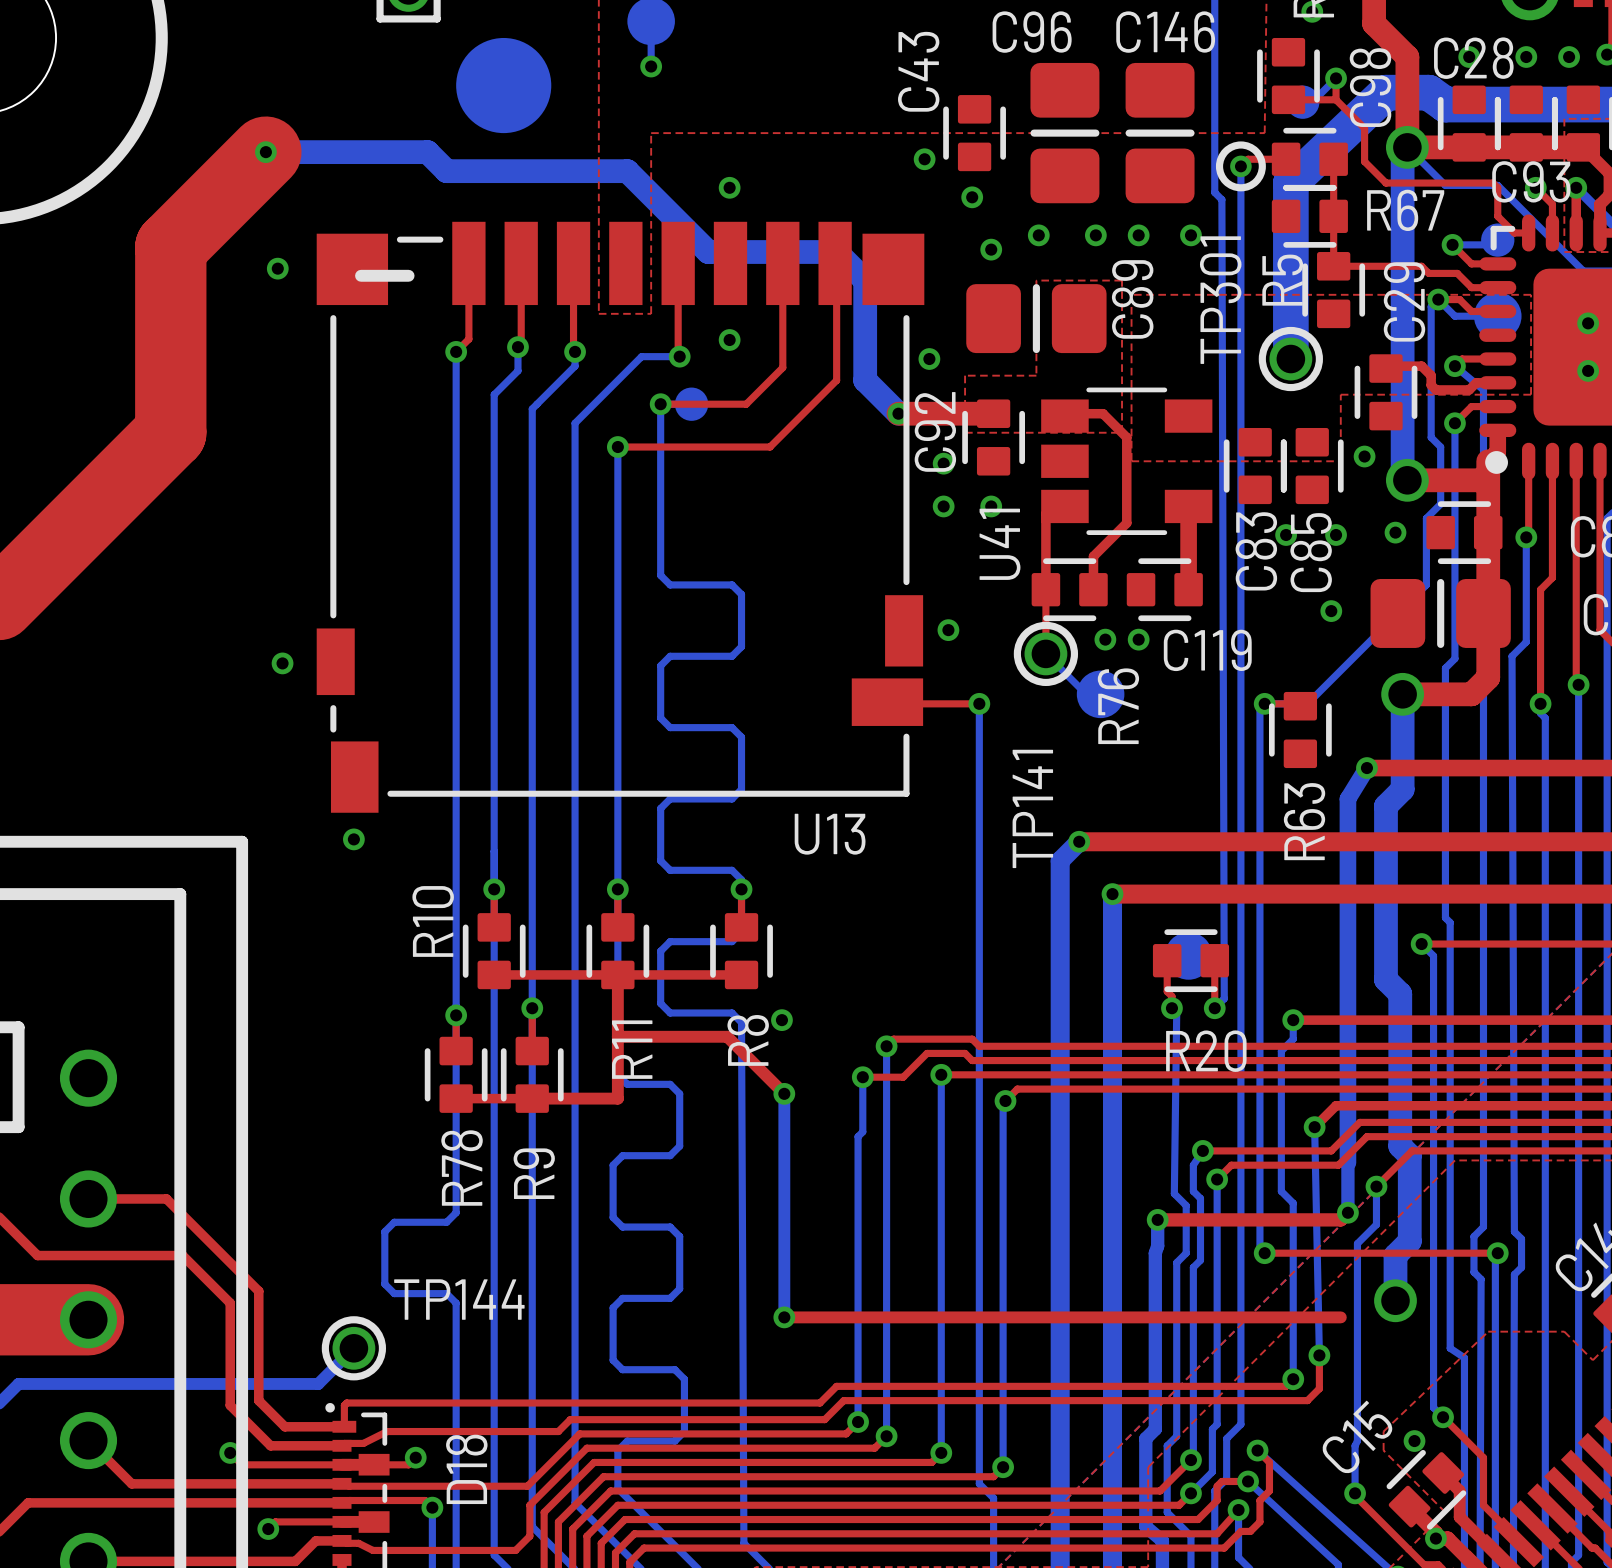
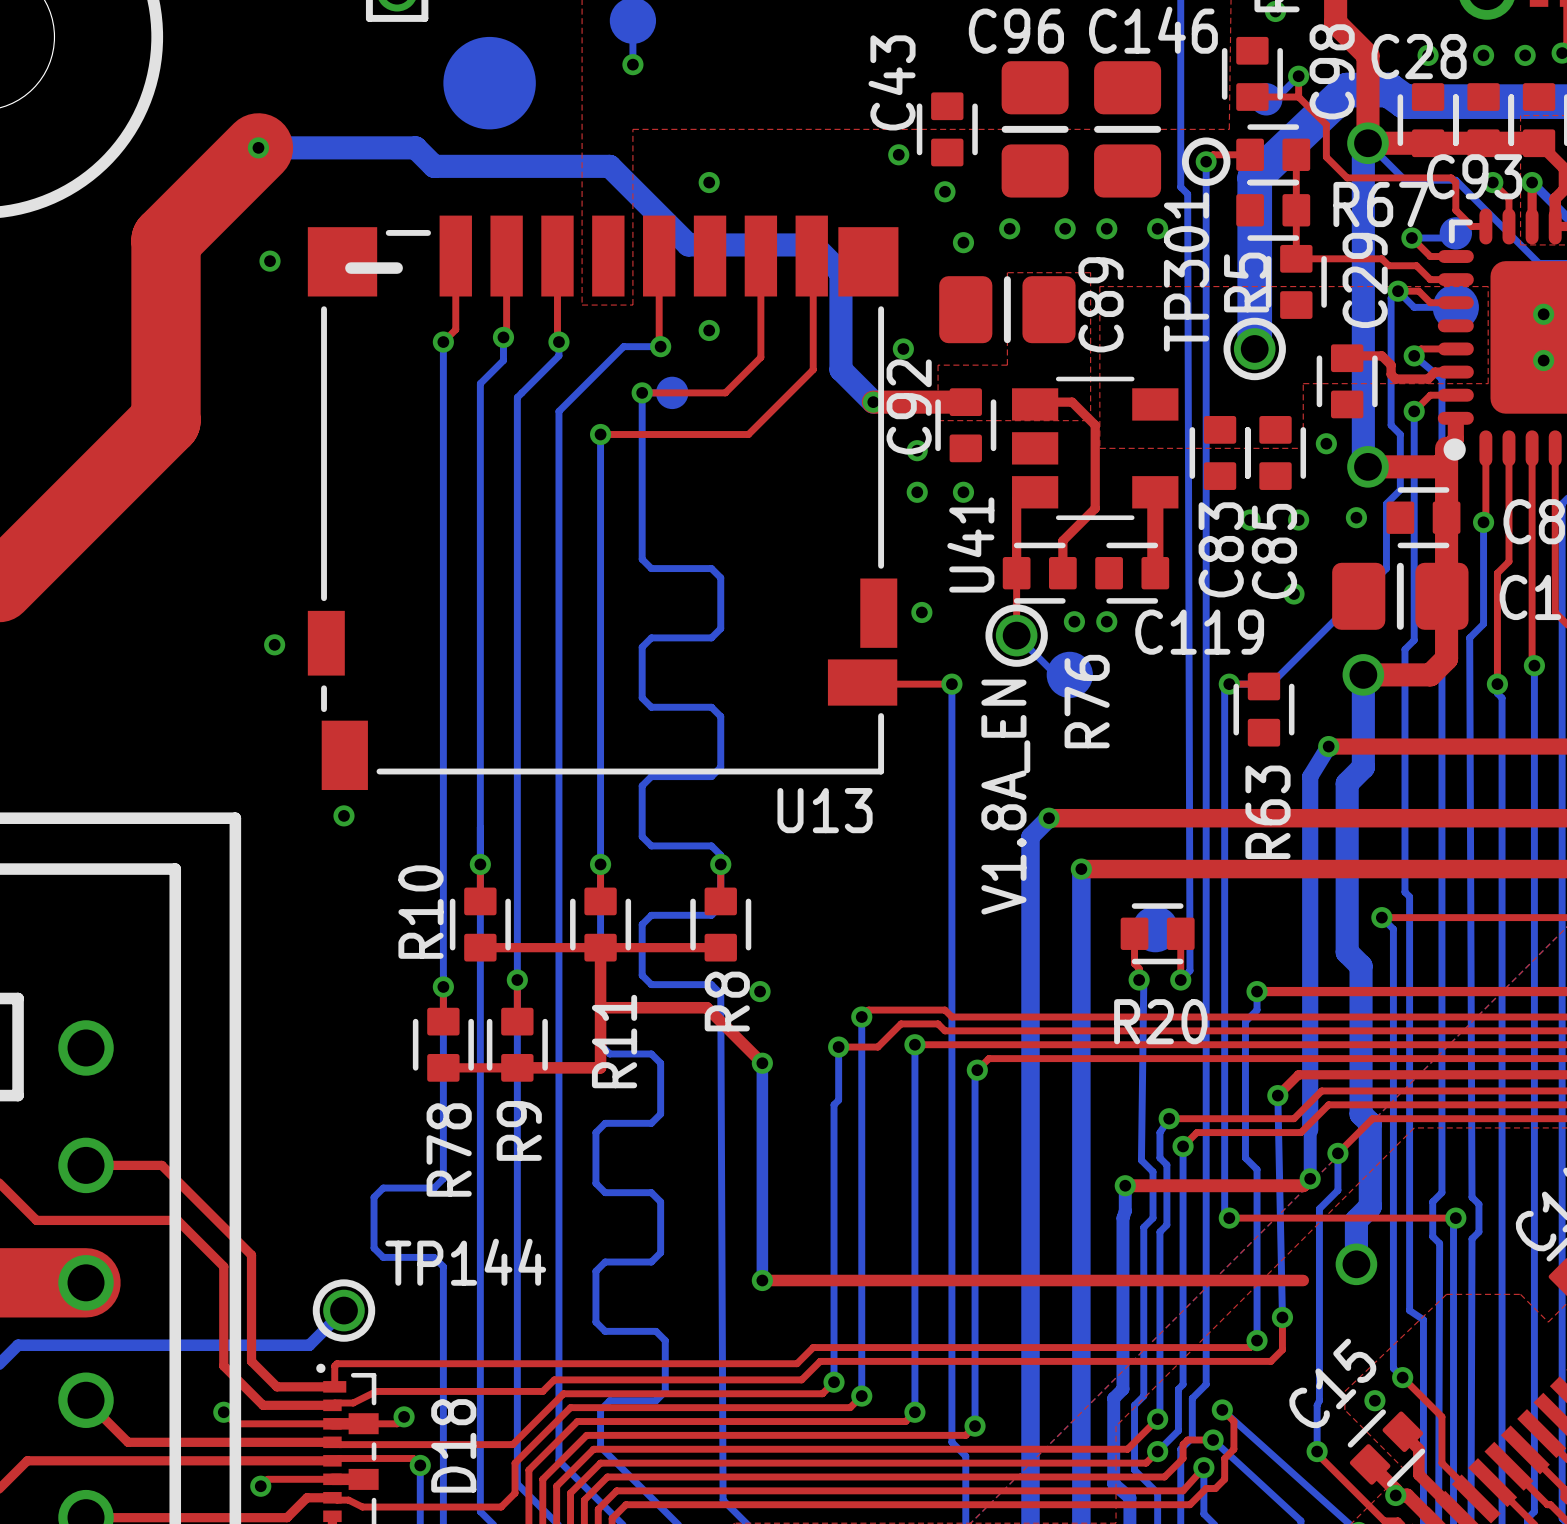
text: none -> V1.8A_EN (1005, 797)
TP141 name: TP141 (1032, 808) -> none

